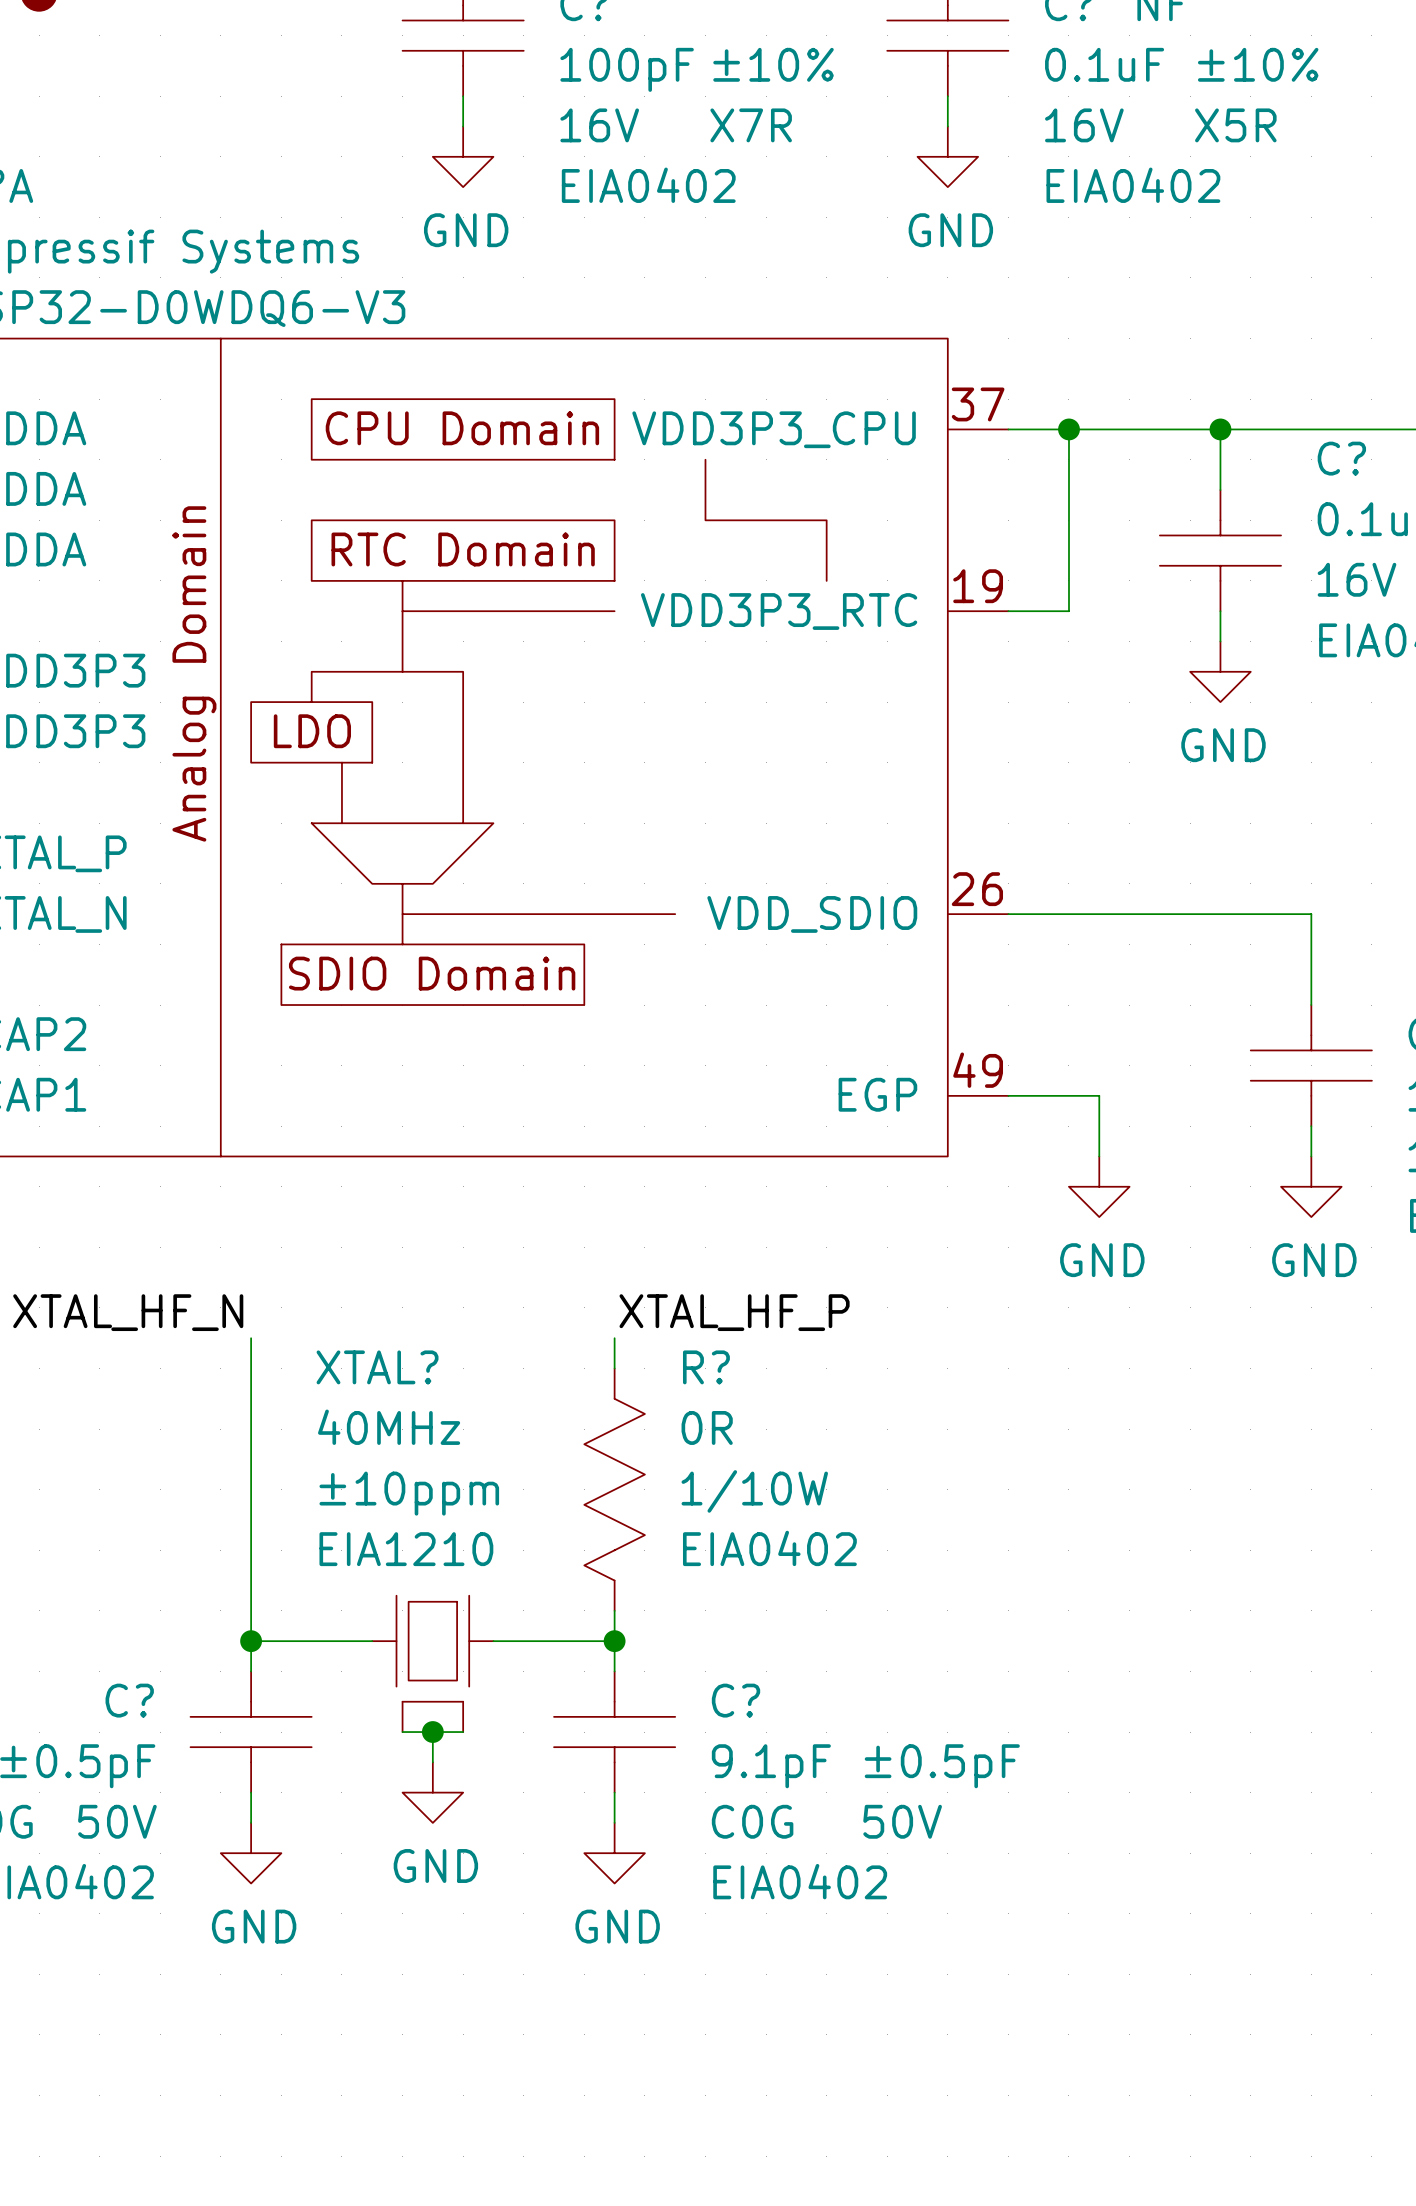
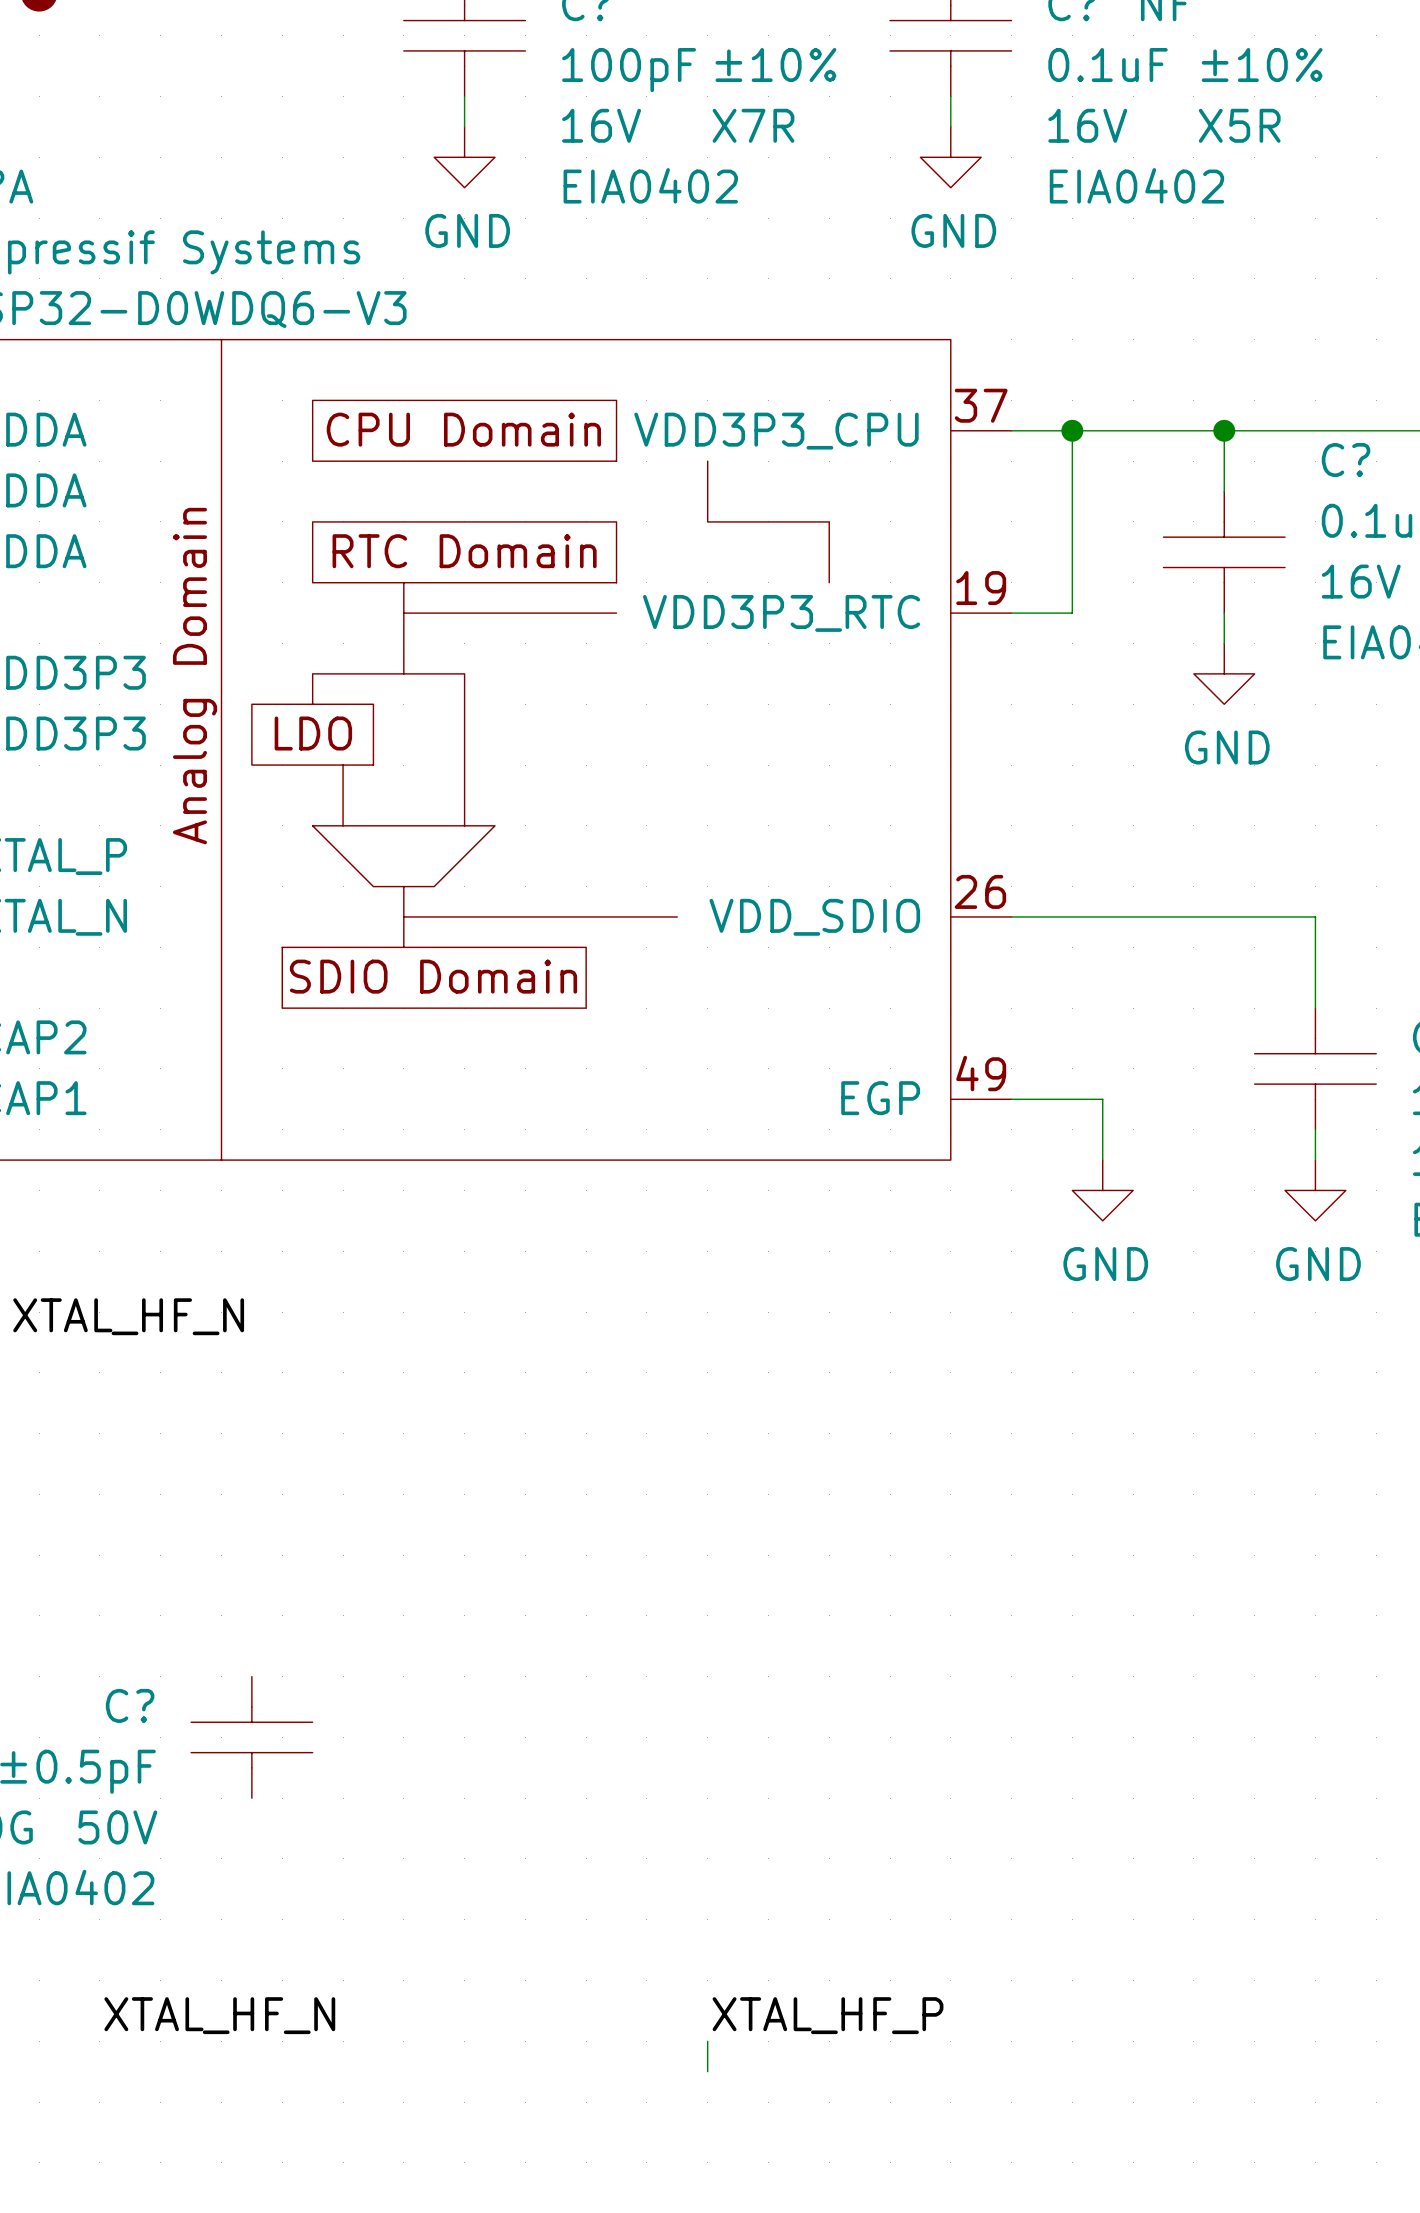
label: XTAL_HF_P (734, 1312) -> none
wire: (251, 1338) (251, 1671) -> none
wire: (614, 1338) (614, 1368) -> none
R?: (614, 1489) -> none
wire: (614, 1610) (614, 1671) -> none
wire: (251, 1641) (372, 1641) -> none
junction: (251, 1641) -> none
wire: (493, 1641) (614, 1641) -> none
junction: (614, 1641) -> none
XTAL?: (432, 1663) -> none
wire: (402, 1732) (463, 1732) -> none
wire: (432, 1732) (432, 1762) -> none
junction: (432, 1732) -> none
C?: (614, 1732) -> none
wire: (251, 1792) (251, 1822) -> none
power symbol: GND (432, 1792) -> none
wire: (614, 1792) (614, 1822) -> (707, 2041) (707, 2071)
power symbol: GND (251, 1853) -> none
power symbol: GND (614, 1853) -> none
label: none -> XTAL_HF_N (219, 2015)
label: none -> XTAL_HF_P (828, 2015)

